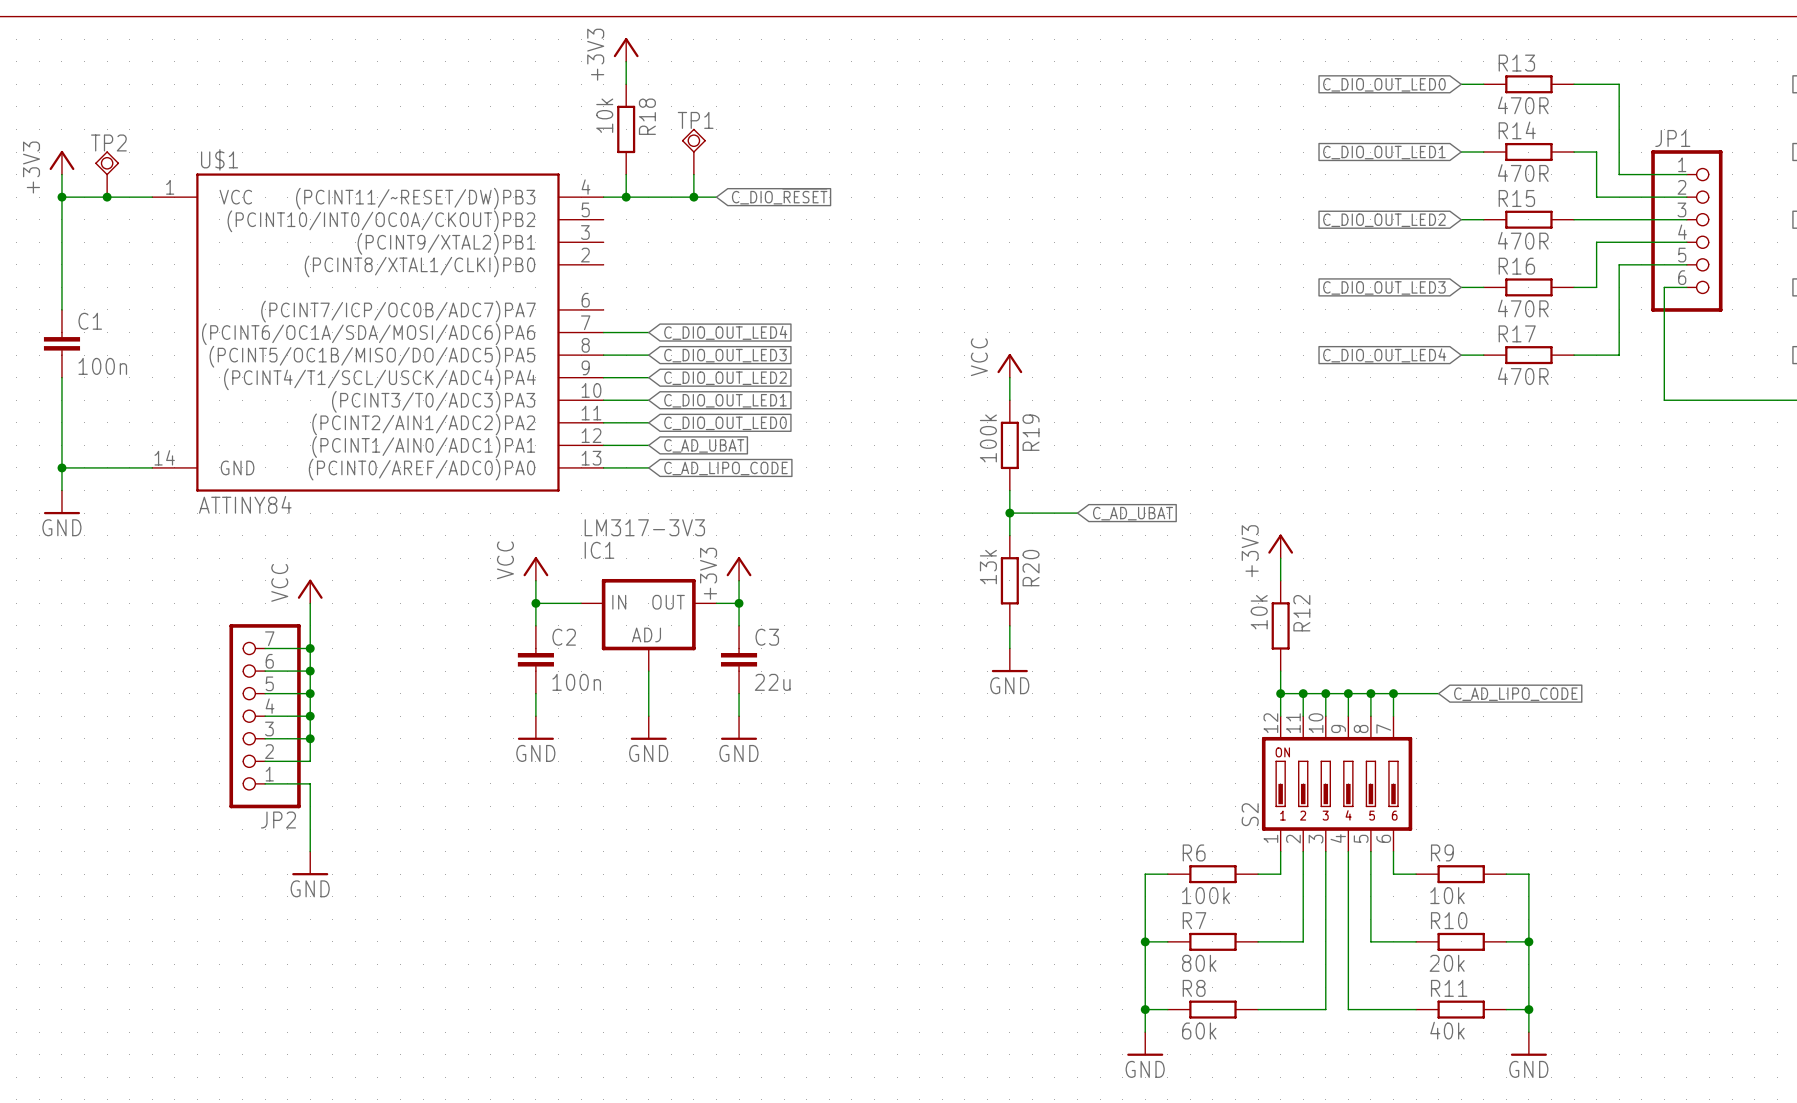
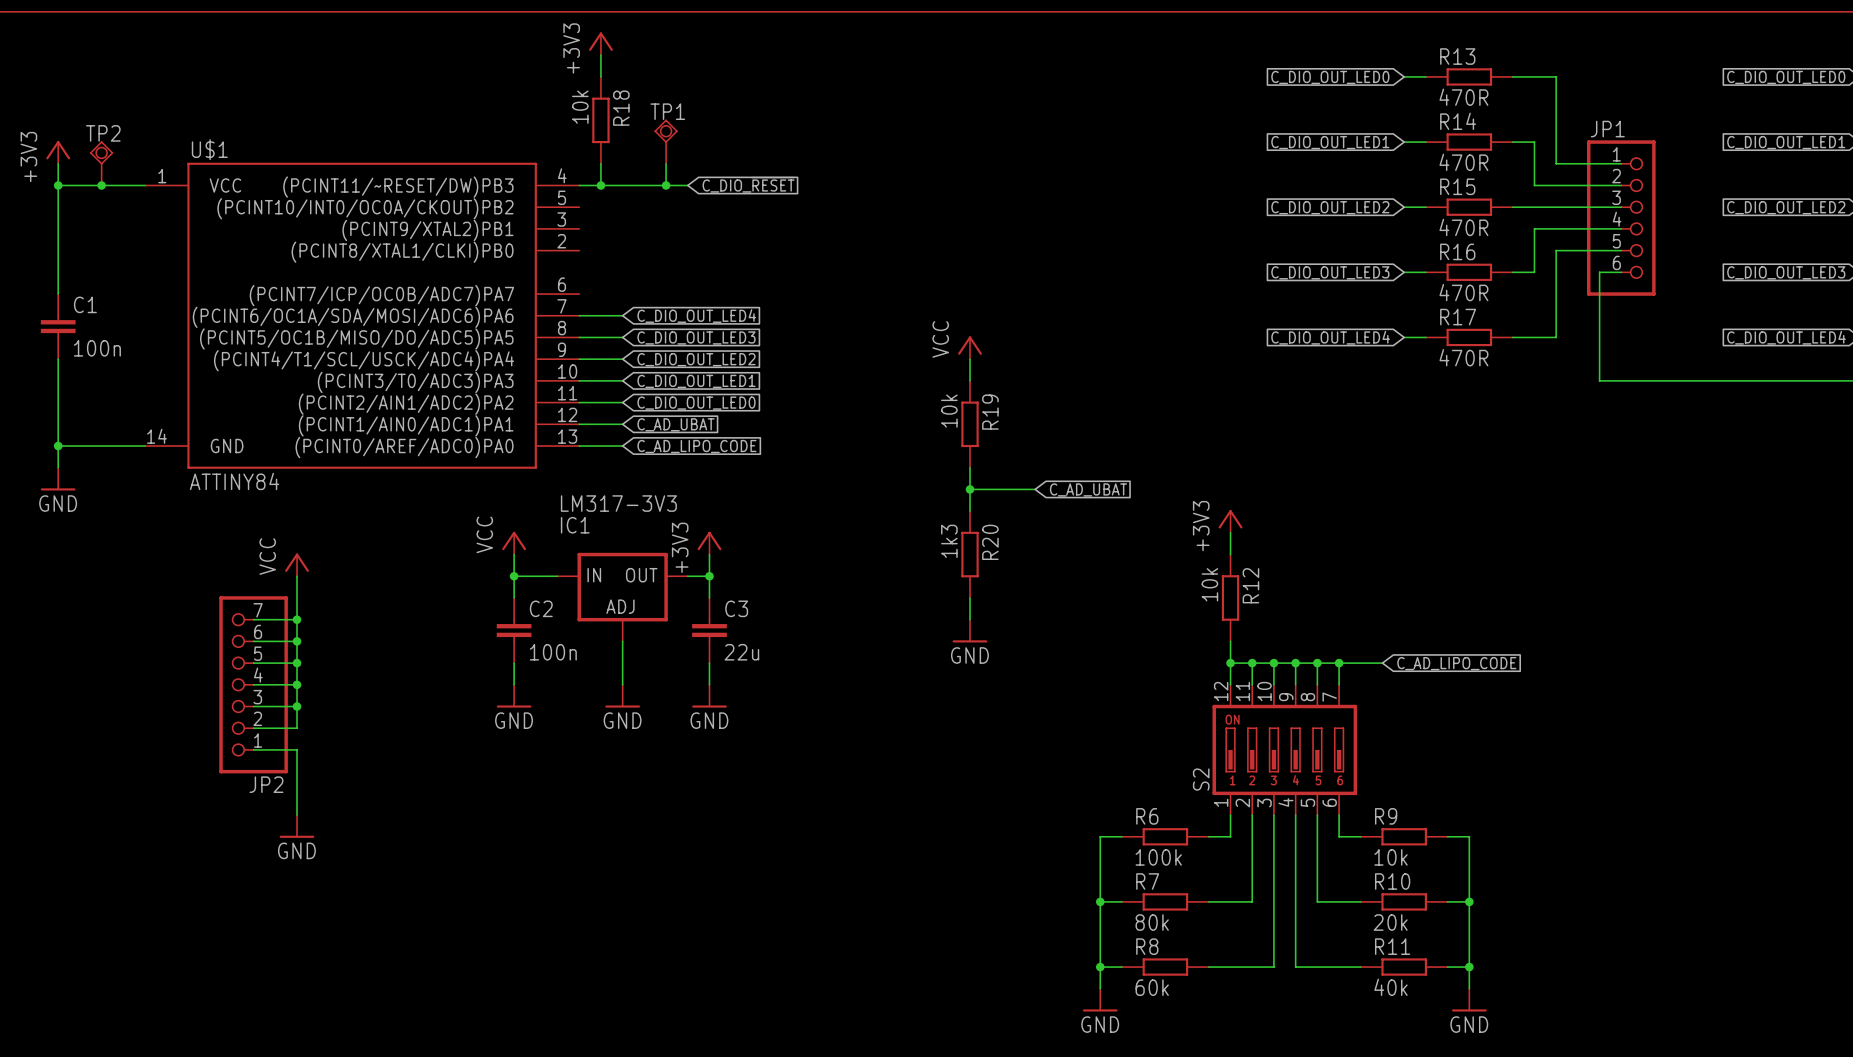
R19 value: 100k (988, 438) -> 10k (949, 411)
R20 value: 13k (988, 567) -> 1k3 (949, 541)

